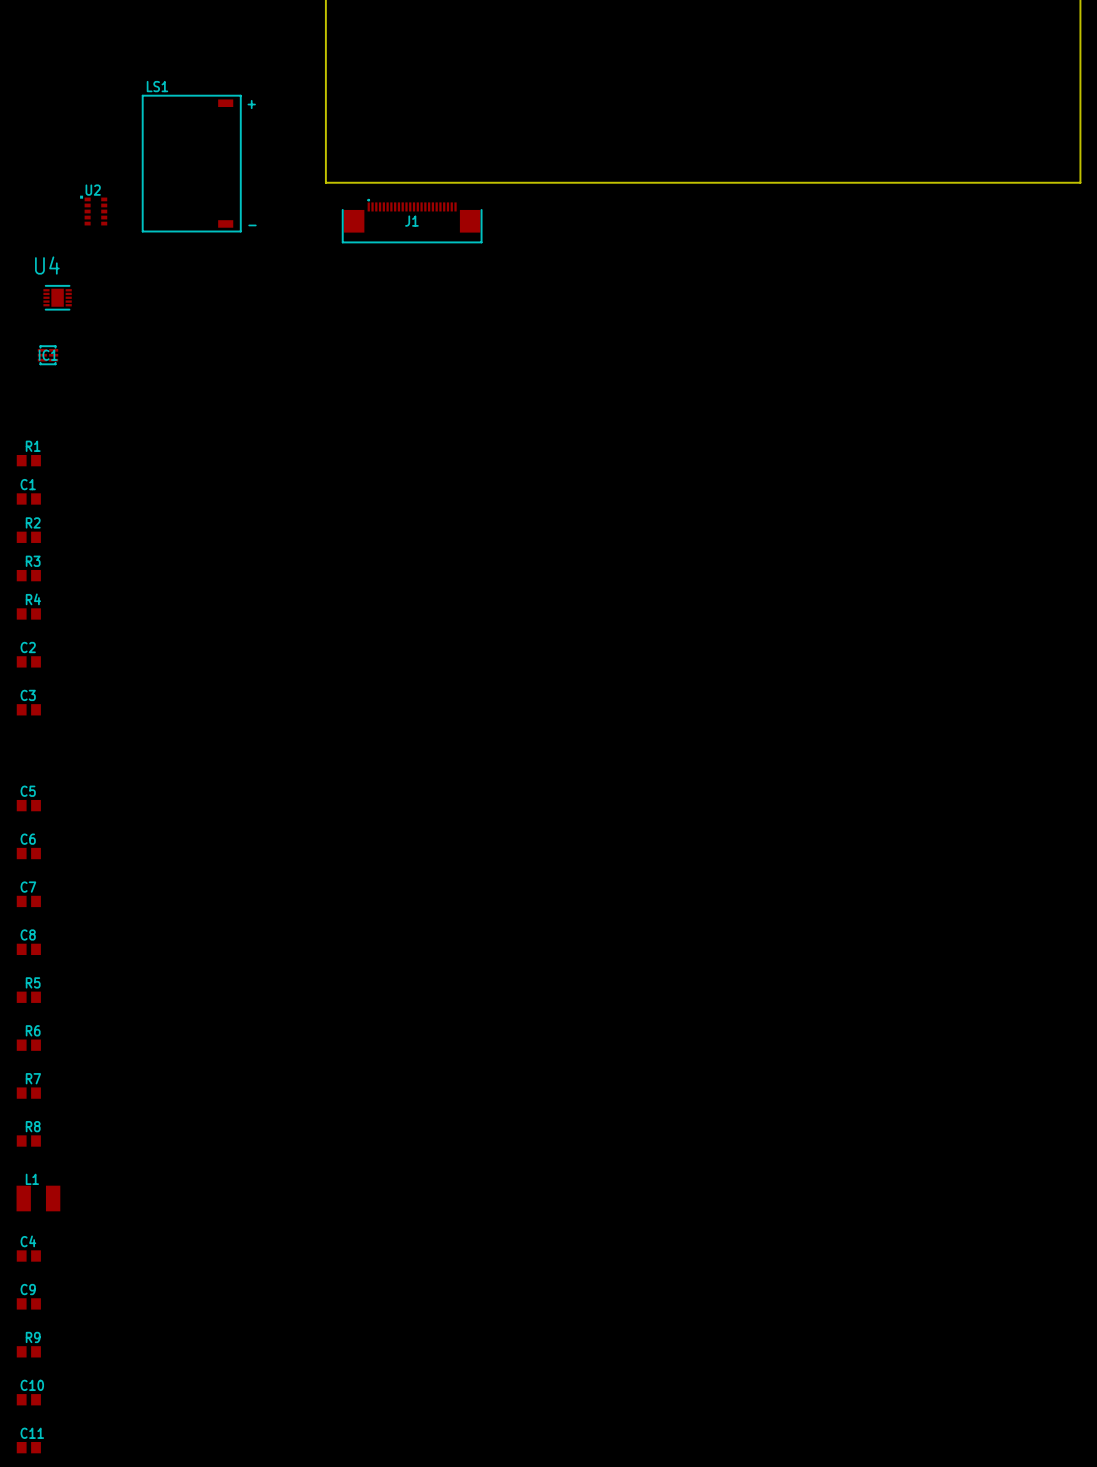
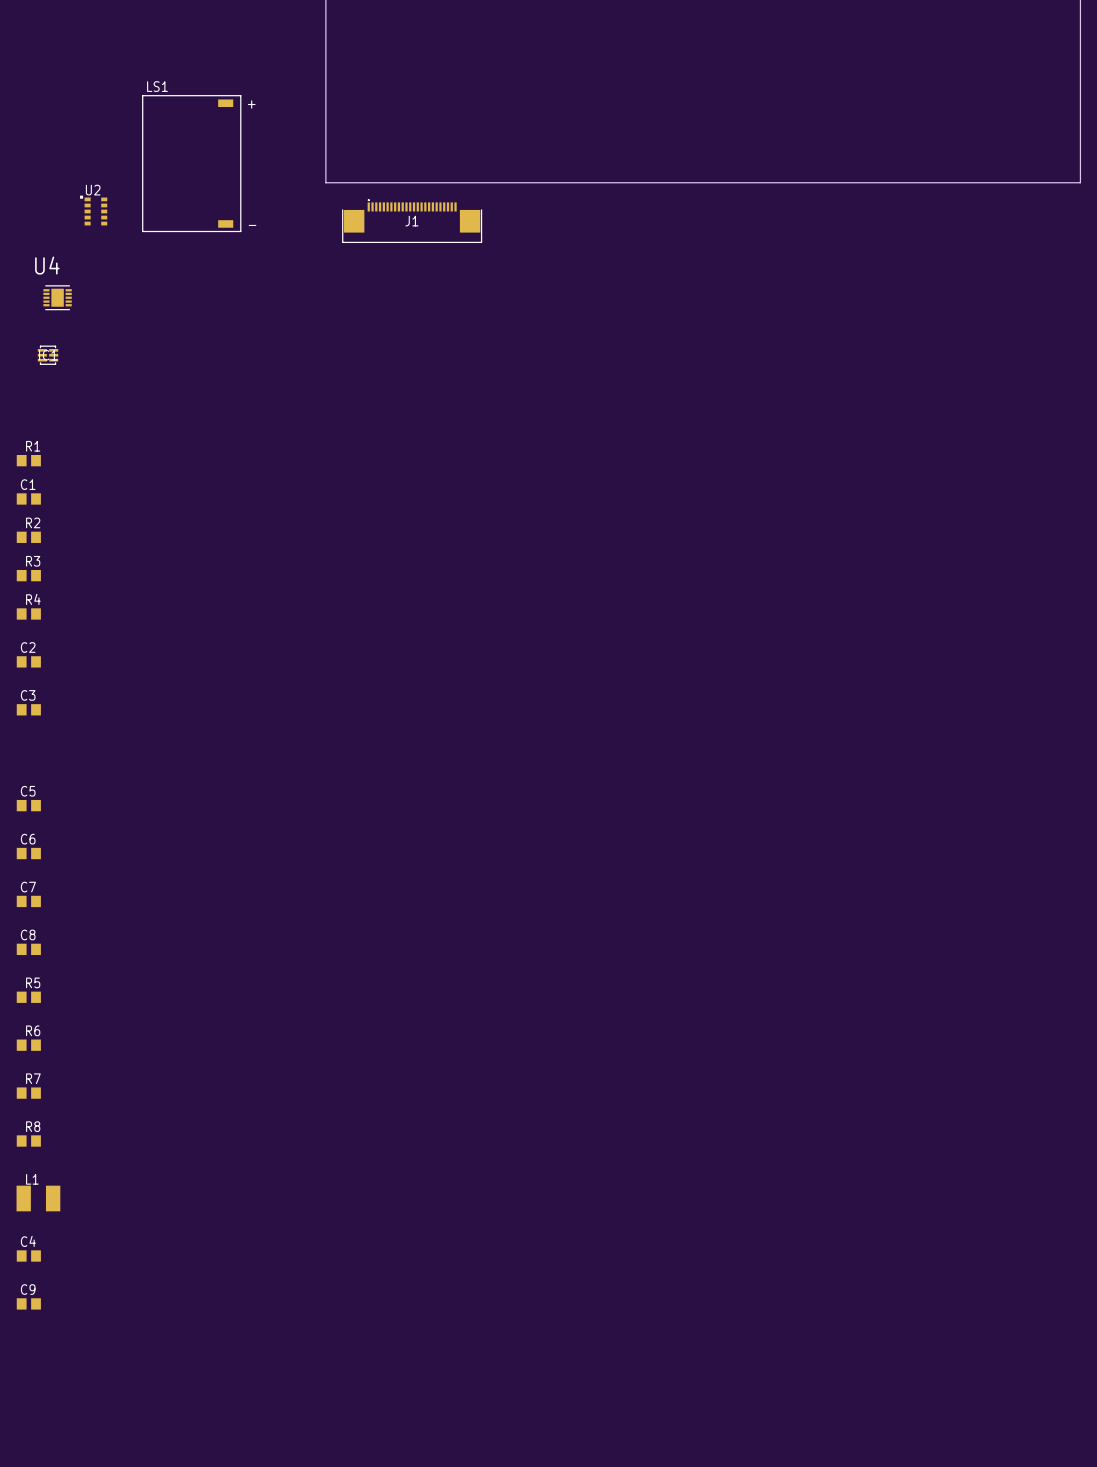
R9: (28, 1351) -> none
C10: (28, 1399) -> none
C11: (28, 1447) -> none

